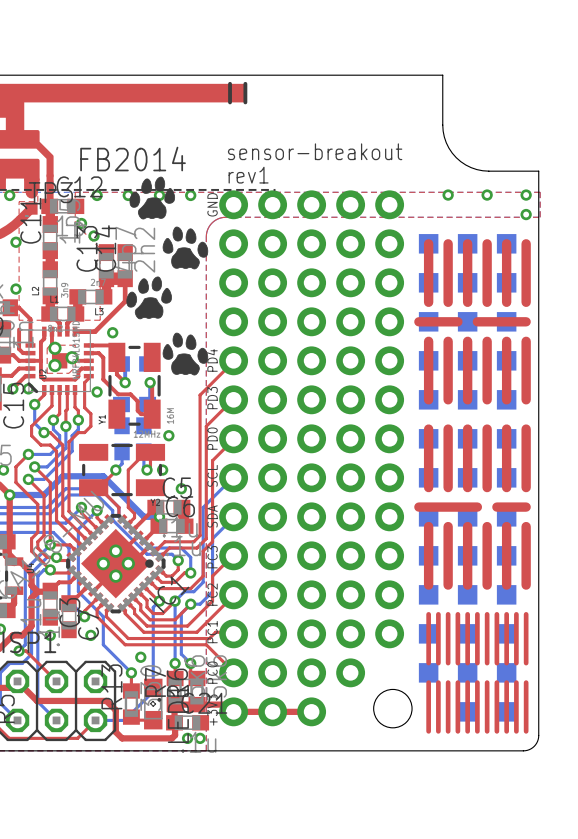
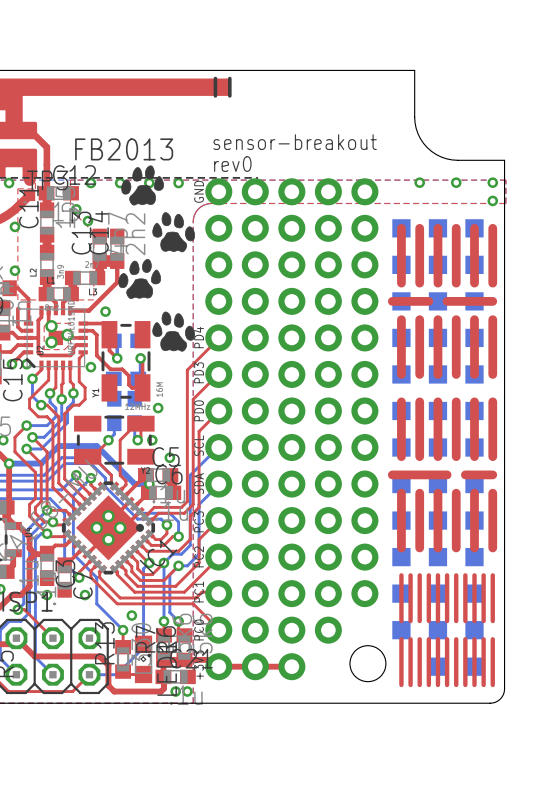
text: FB2014 (133, 159) -> FB2013 (124, 149)
text: rev1 (248, 175) -> rev0 (232, 164)

